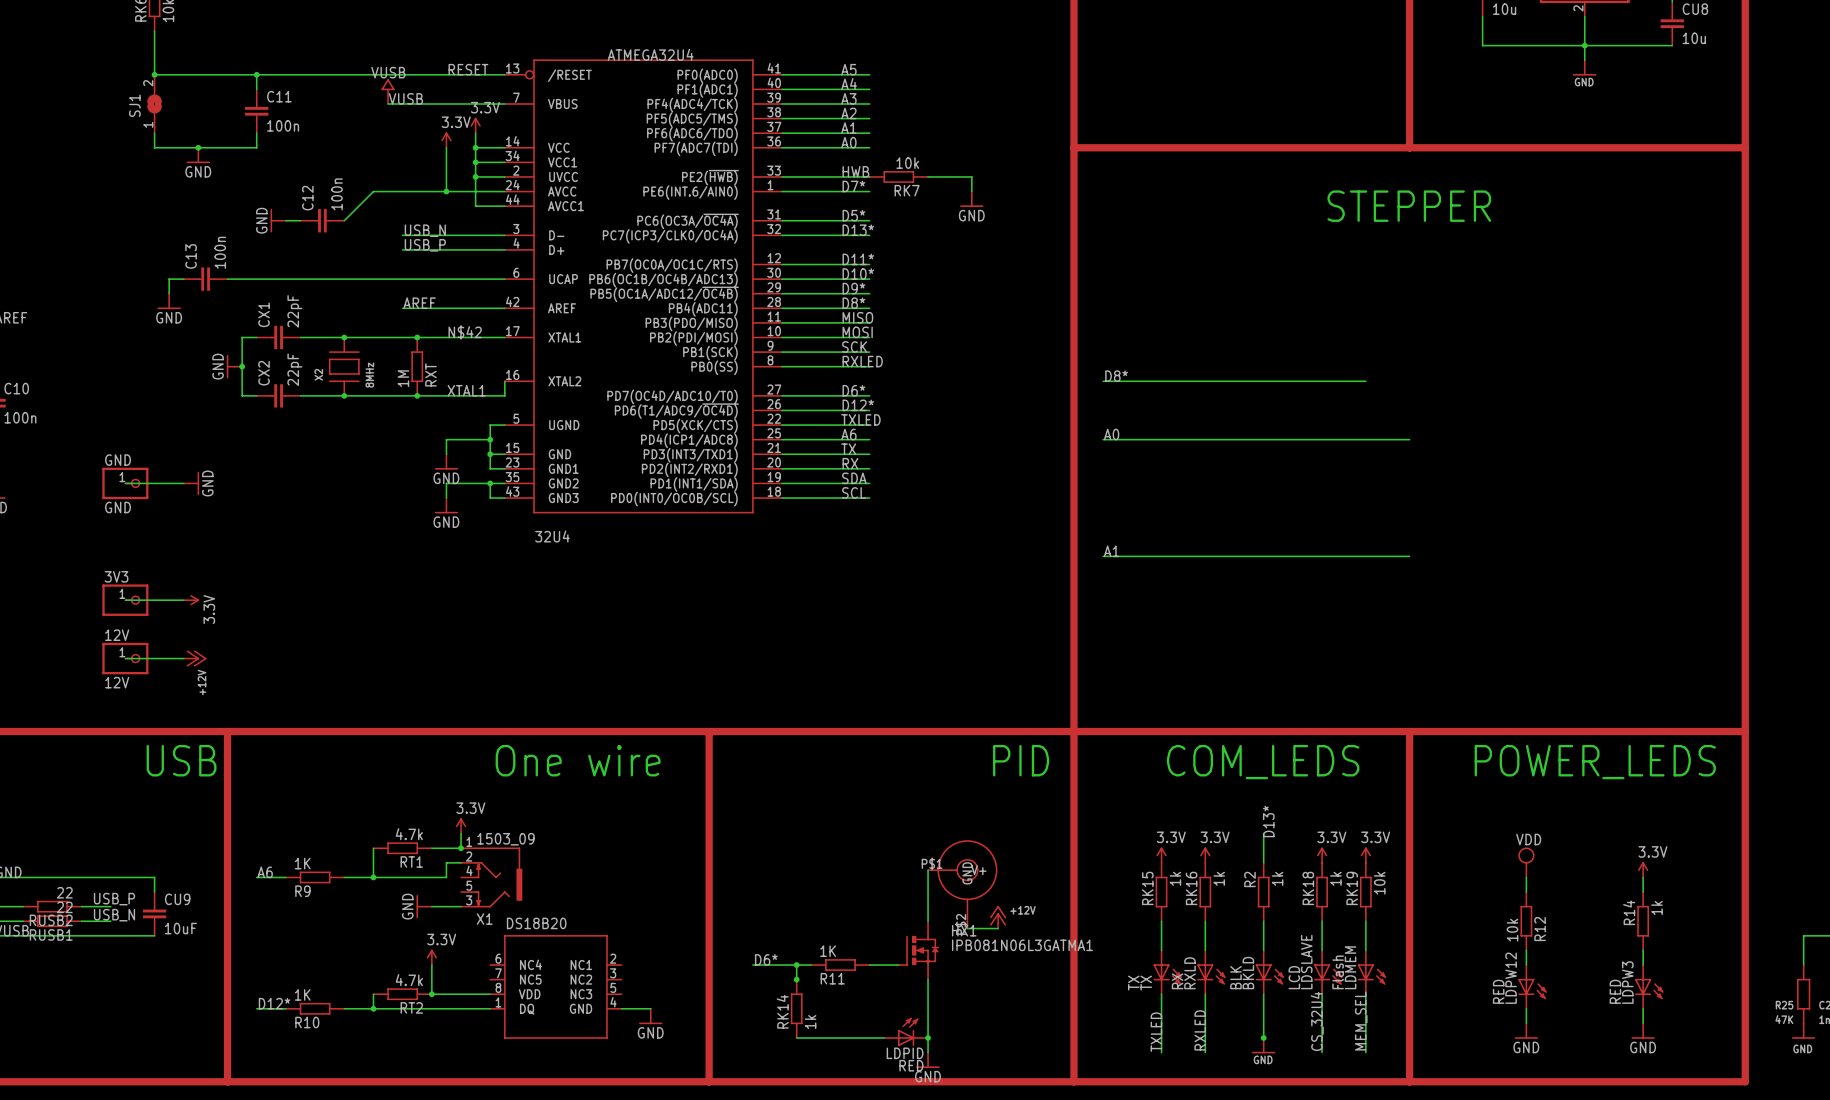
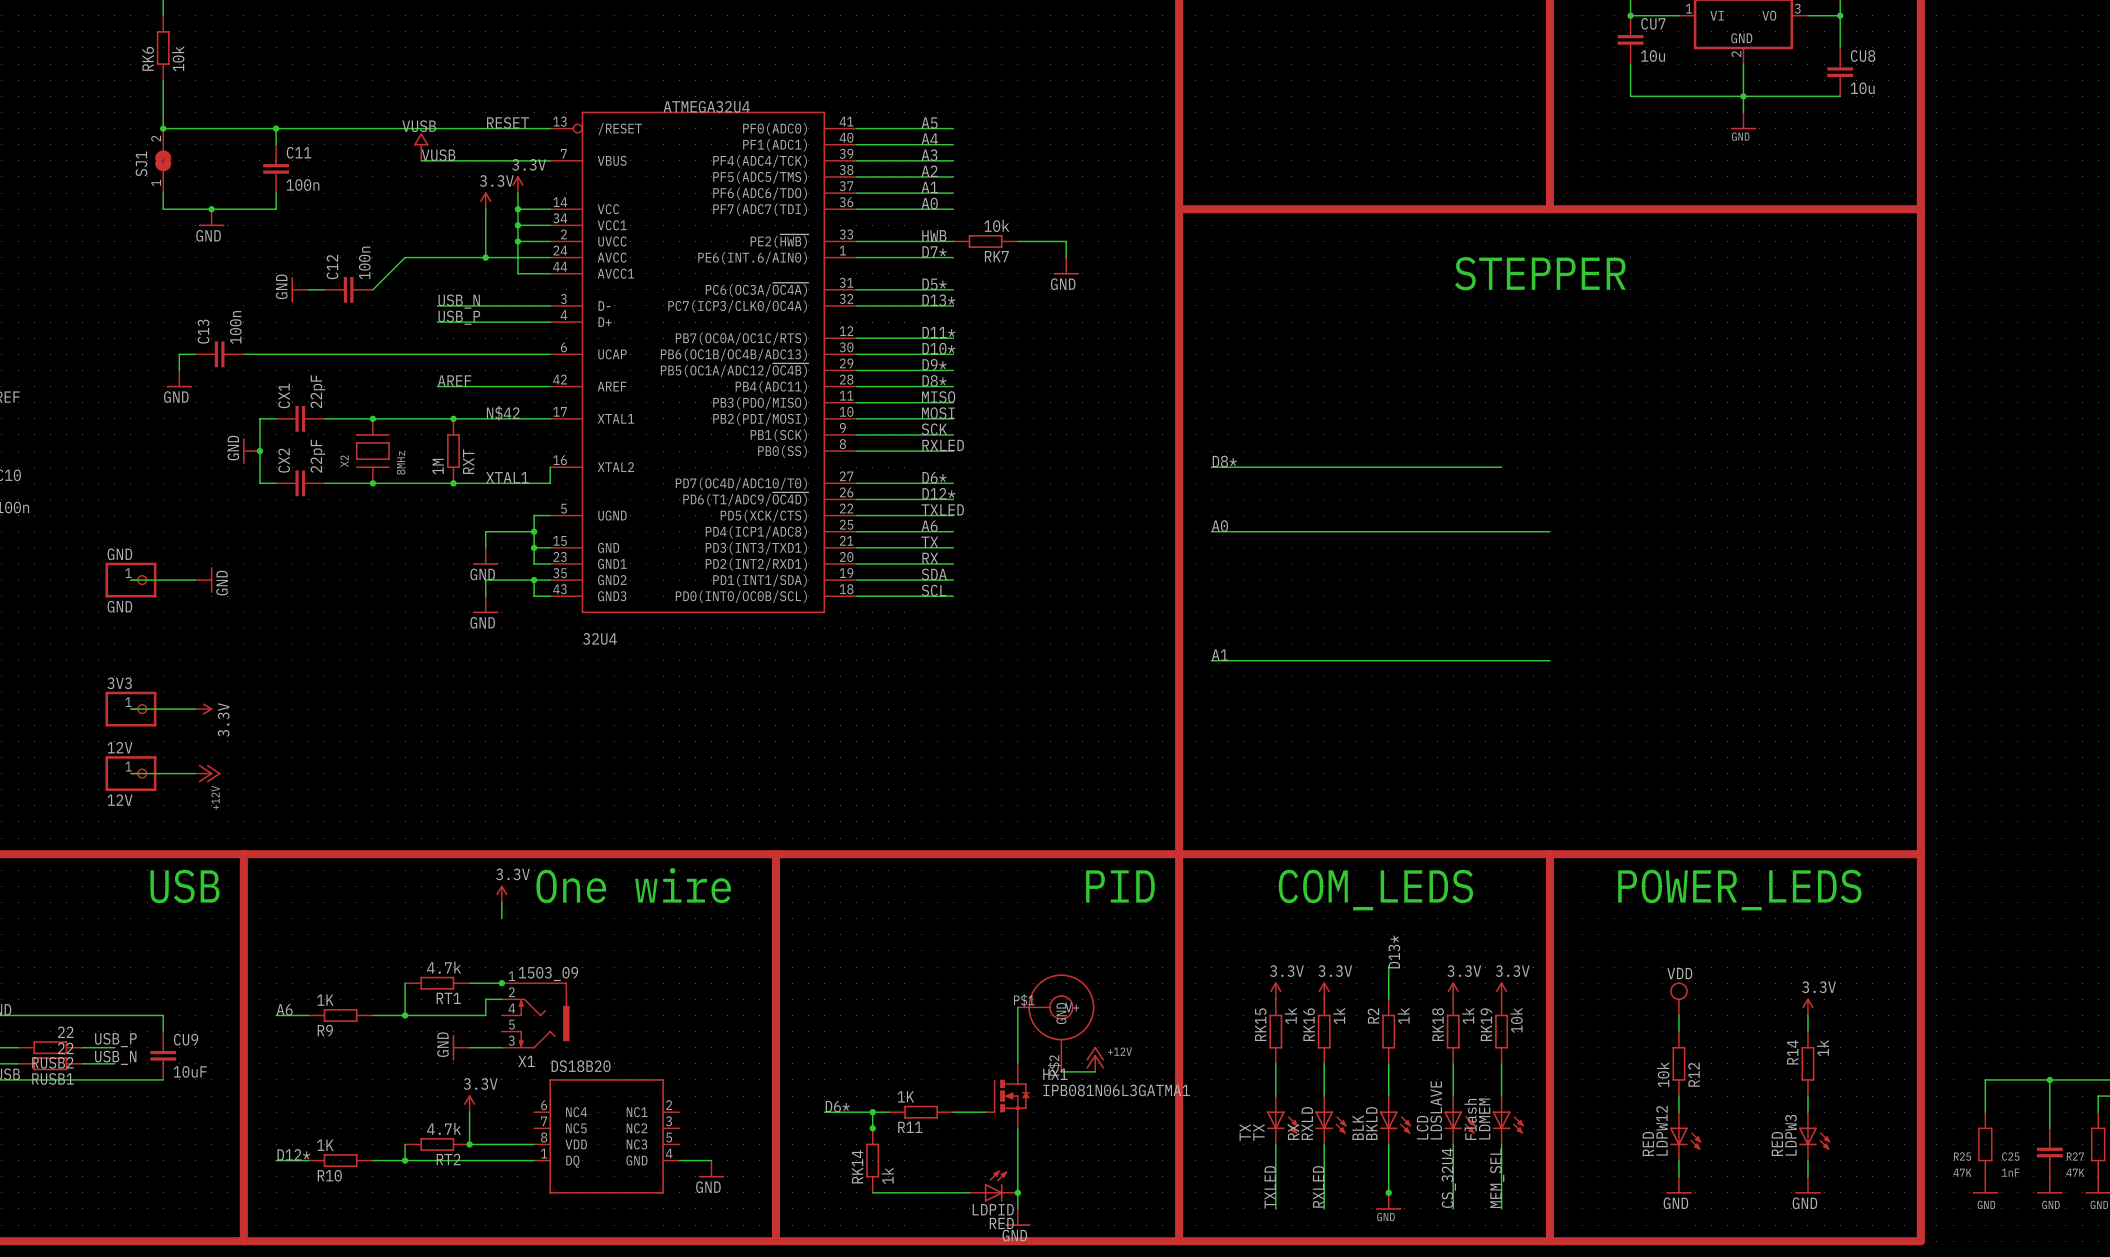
power symbol position: 3.3V (461, 826) -> 3.3V (501, 894)
wire: (461, 833) (461, 848) -> (501, 902) (501, 918)

